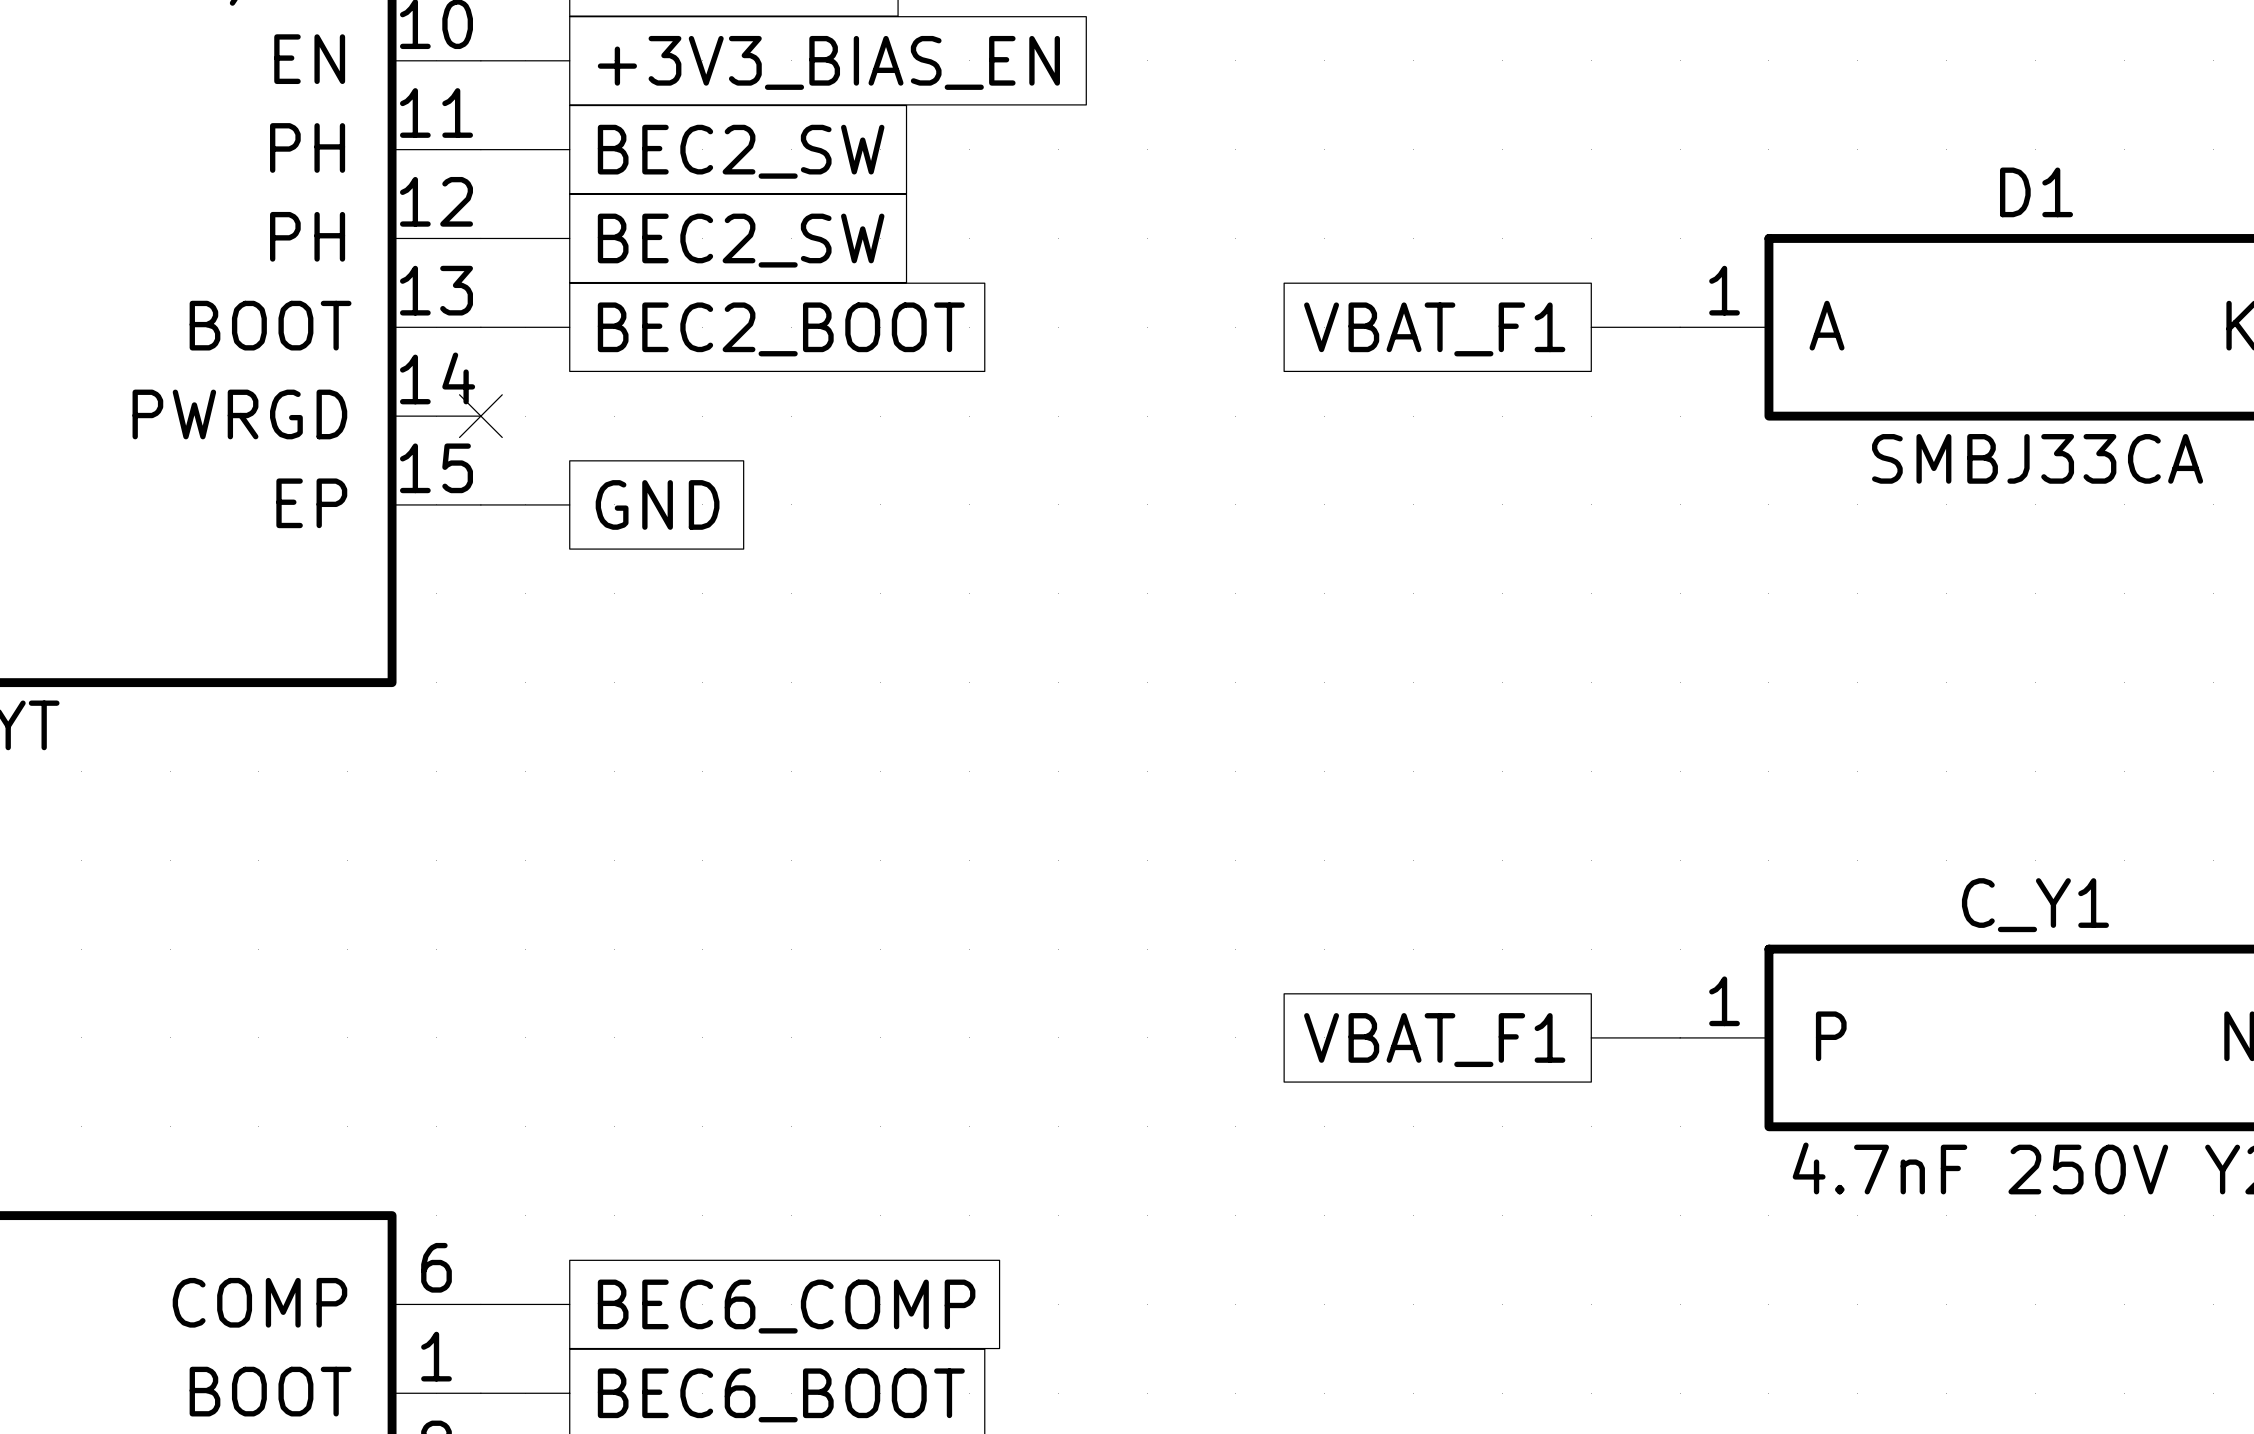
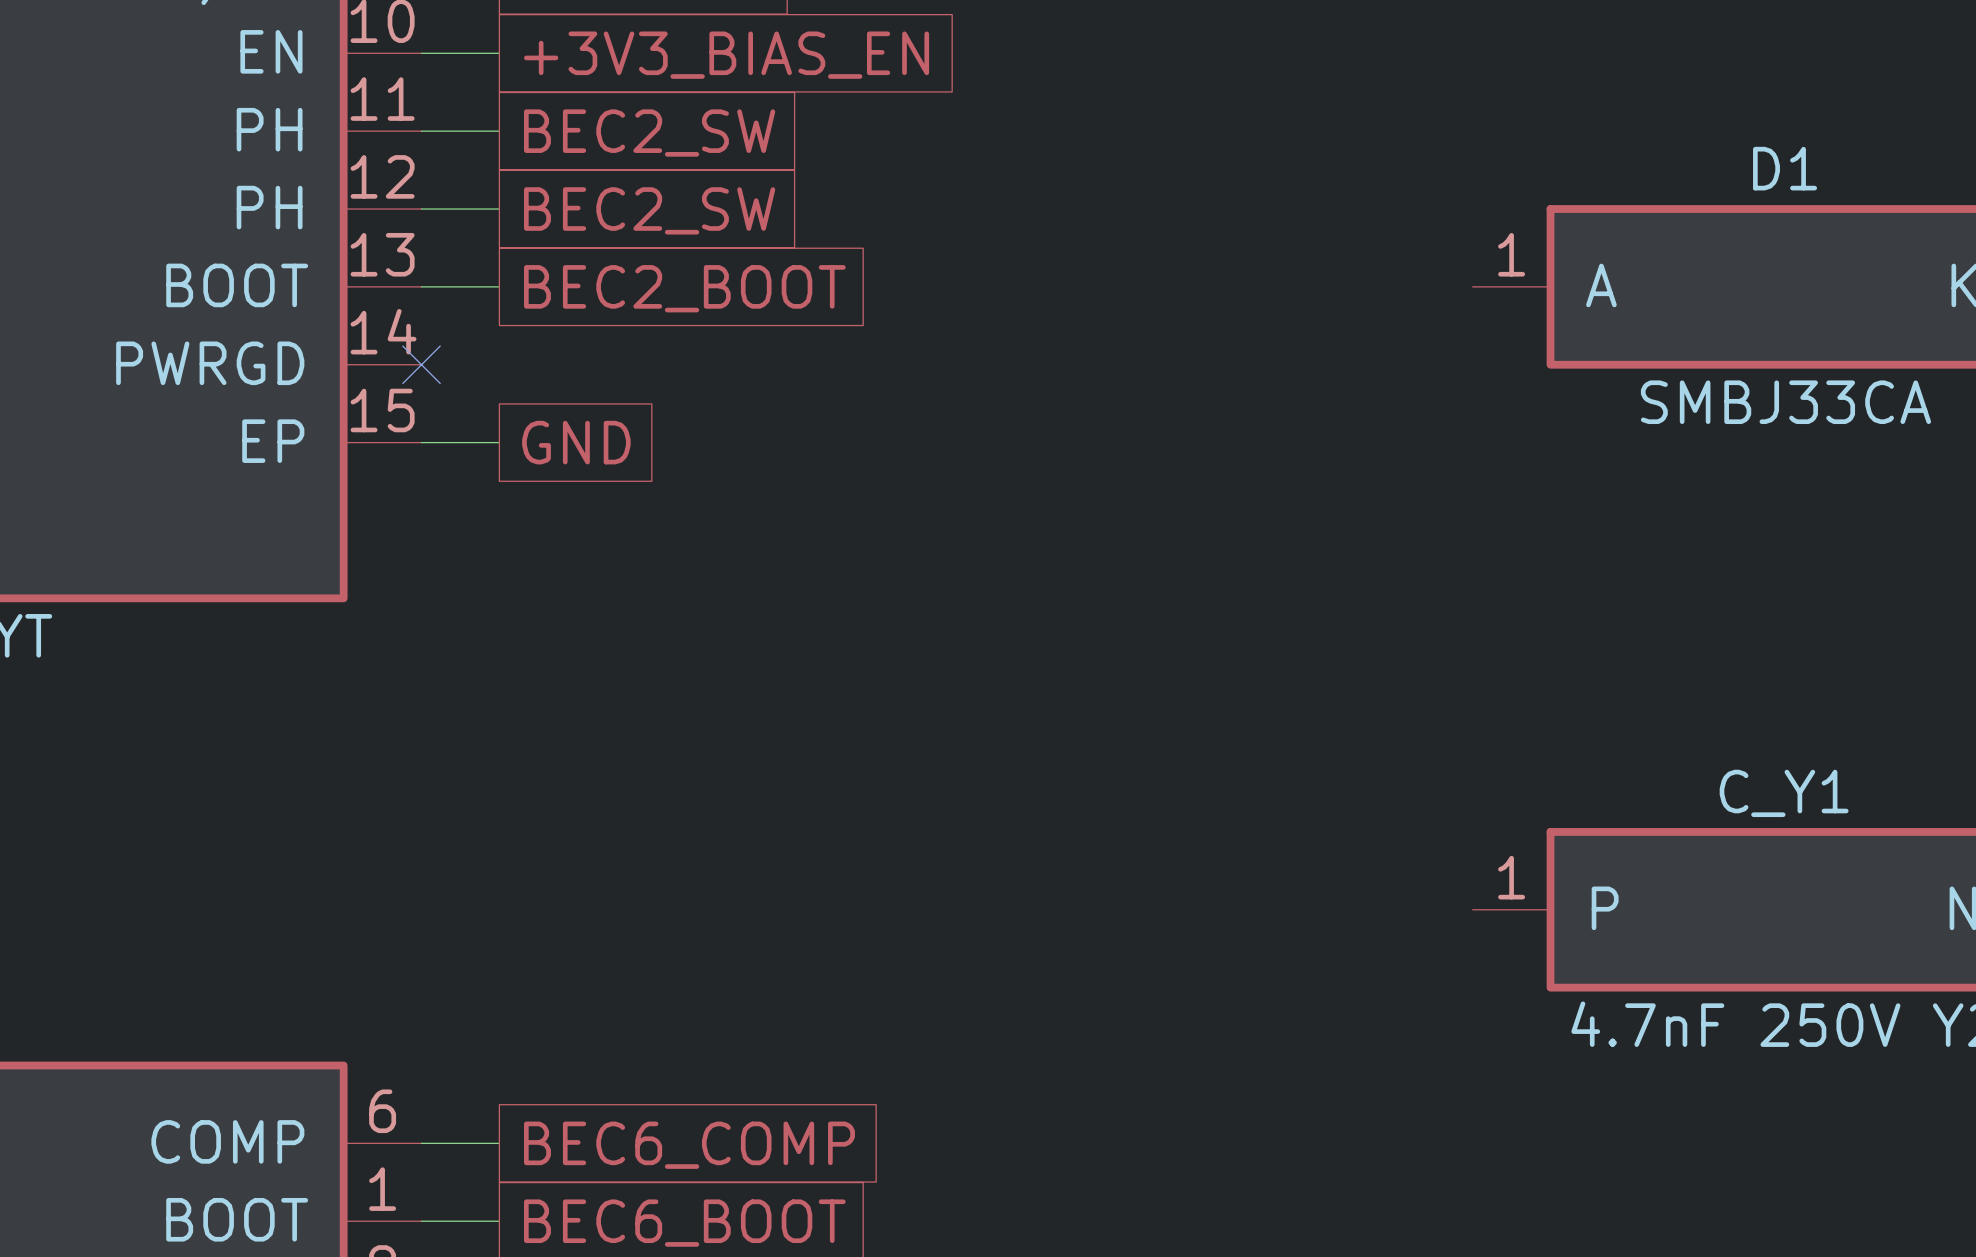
wire: (1591, 327) (1680, 327) -> none
global label: VBAT_F1 (1434, 329) -> none
wire: (1591, 1037) (1680, 1037) -> none
global label: VBAT_F1 (1434, 1040) -> none

